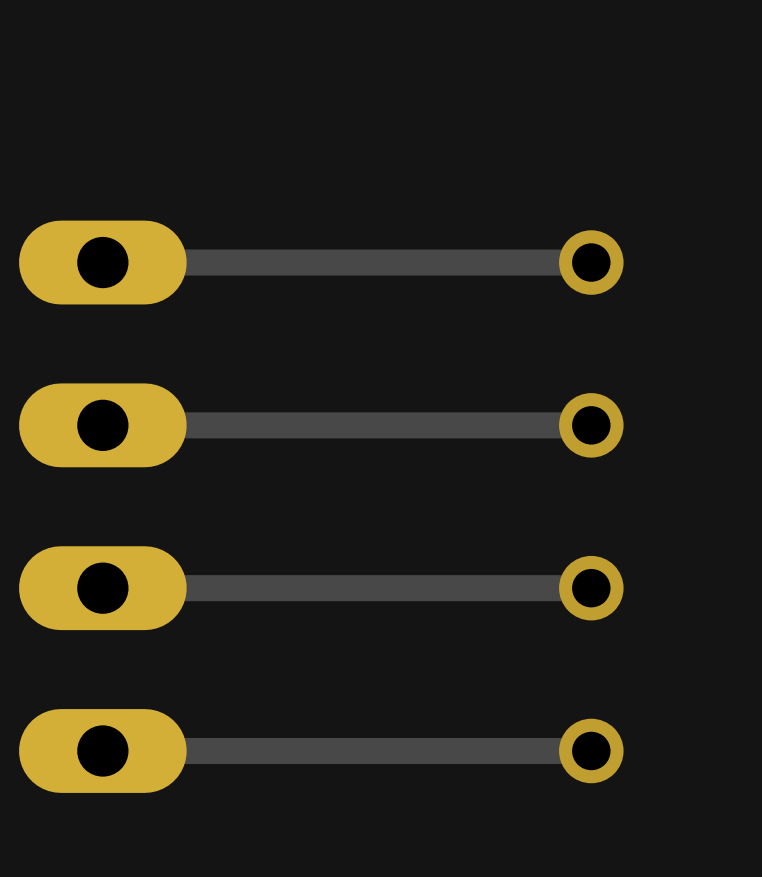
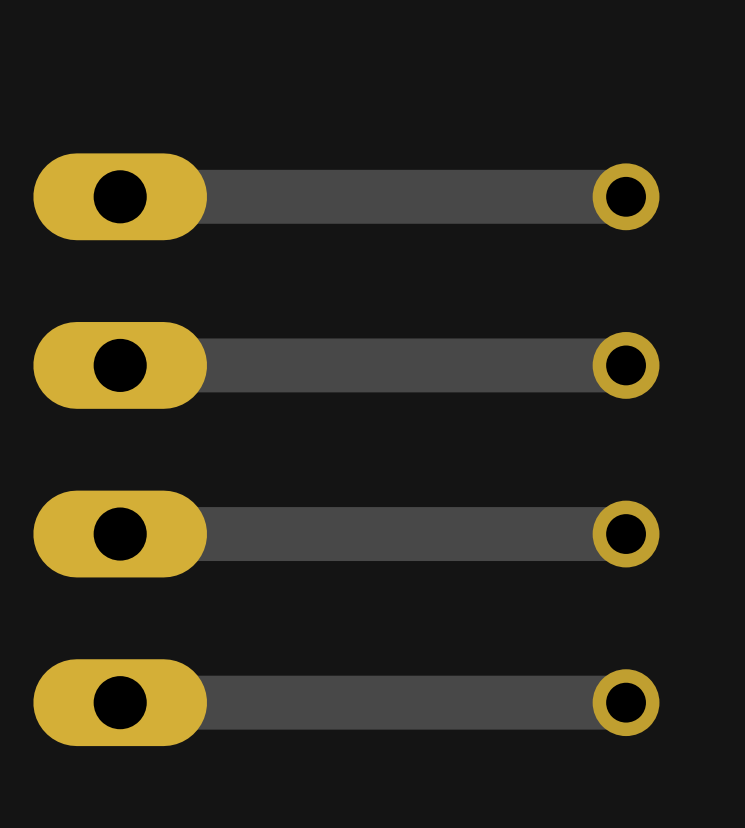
track width: thin (591, 262) (102, 262) -> thick (626, 196) (120, 196)
track width: thin (591, 425) (102, 425) -> thick (626, 365) (120, 365)
track width: thin (591, 588) (102, 588) -> thick (626, 534) (120, 534)
track width: thin (591, 750) (102, 750) -> thick (626, 702) (120, 702)

